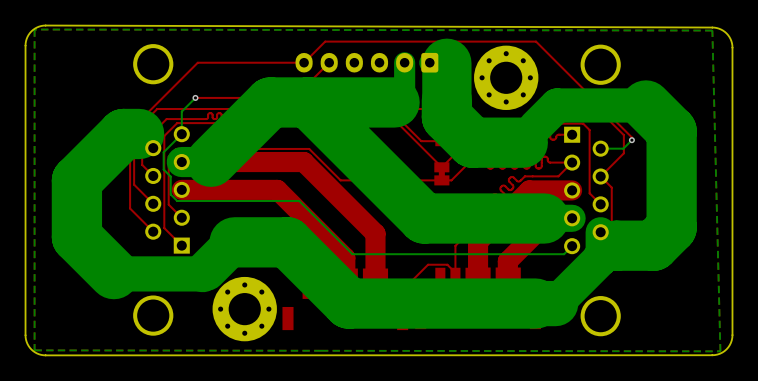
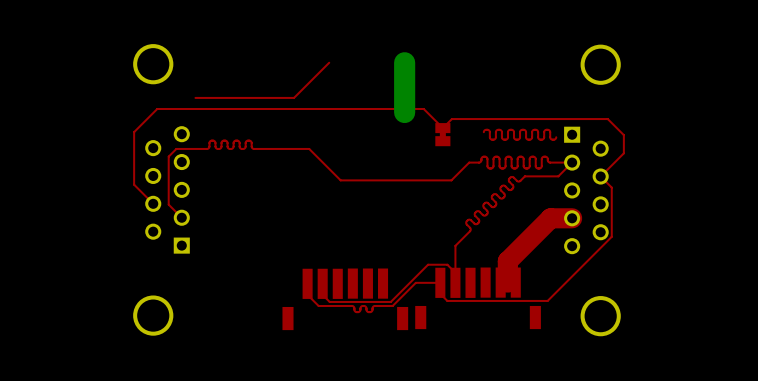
board edge: (45, 25) (712, 27) (721, 29) (729, 36) (732, 47) (730, 342) (724, 351) (712, 355) (45, 355) (36, 353) (28, 345) (25, 335) (25, 45) (31, 31) (45, 25) -> none
bottom zone outline: (34, 29) (712, 30) (720, 351) (34, 350) (34, 29) -> none
part: (366, 62) -> none
bottom track: (429, 62) (447, 62) (446, 100) -> none
part: (506, 77) -> none
bottom track: (195, 97) (181, 111) (181, 134) (163, 152) (163, 169) (170, 176) (170, 194) (177, 200) (299, 200) (352, 254) (564, 254) (572, 246) -> none
via: (195, 97) -> none
bottom track: (446, 100) (446, 117) (472, 142) (522, 142) -> none
bottom track: (308, 102) (424, 218) (572, 218) -> none
bottom track: (394, 102) (270, 102) (210, 162) (181, 162) -> none
bottom track: (535, 127) (557, 105) (646, 105) (671, 131) (671, 227) (653, 245) (616, 245) -> none
top track: (483, 132) (481, 134) (474, 134) (441, 167) (397, 123) (177, 123) (164, 136) (164, 228) (181, 245) -> none
top track: (572, 134) (558, 134) (556, 137) -> none
bottom track: (631, 140) (623, 148) (600, 148) -> none
top track: (631, 140) (631, 137) (536, 41) (325, 41) (304, 62) (197, 62) (130, 130) (130, 208) (153, 231) -> none
via: (631, 140) -> none
bottom track: (153, 148) (139, 133) (123, 133) (76, 180) (76, 237) (113, 274) -> none
top track: (181, 162) (303, 162) (375, 233) (375, 283) -> none
part: (441, 173) -> none
top track: (153, 175) (142, 164) (142, 143) (166, 119) (206, 119) (209, 113) (212, 113) (214, 119) (218, 113) (221, 114) (222, 118) (225, 118) (226, 114) (228, 113) (231, 118) (233, 119) (237, 113) (241, 119) (246, 113) (248, 114) (249, 118) (252, 118) (255, 113) (259, 119) (264, 113) (268, 119) (399, 119) (421, 141) (449, 141) (466, 123) (583, 123) (589, 130) (589, 193) (600, 204) -> none
top track: (181, 189) (277, 189) (345, 257) (345, 283) -> none
top track: (572, 190) (529, 190) (478, 241) (478, 282) -> none
bottom track: (600, 232) (600, 258) (555, 303) (348, 303) (287, 242) (234, 242) (202, 274) (114, 273) -> none
part: (244, 309) -> none

